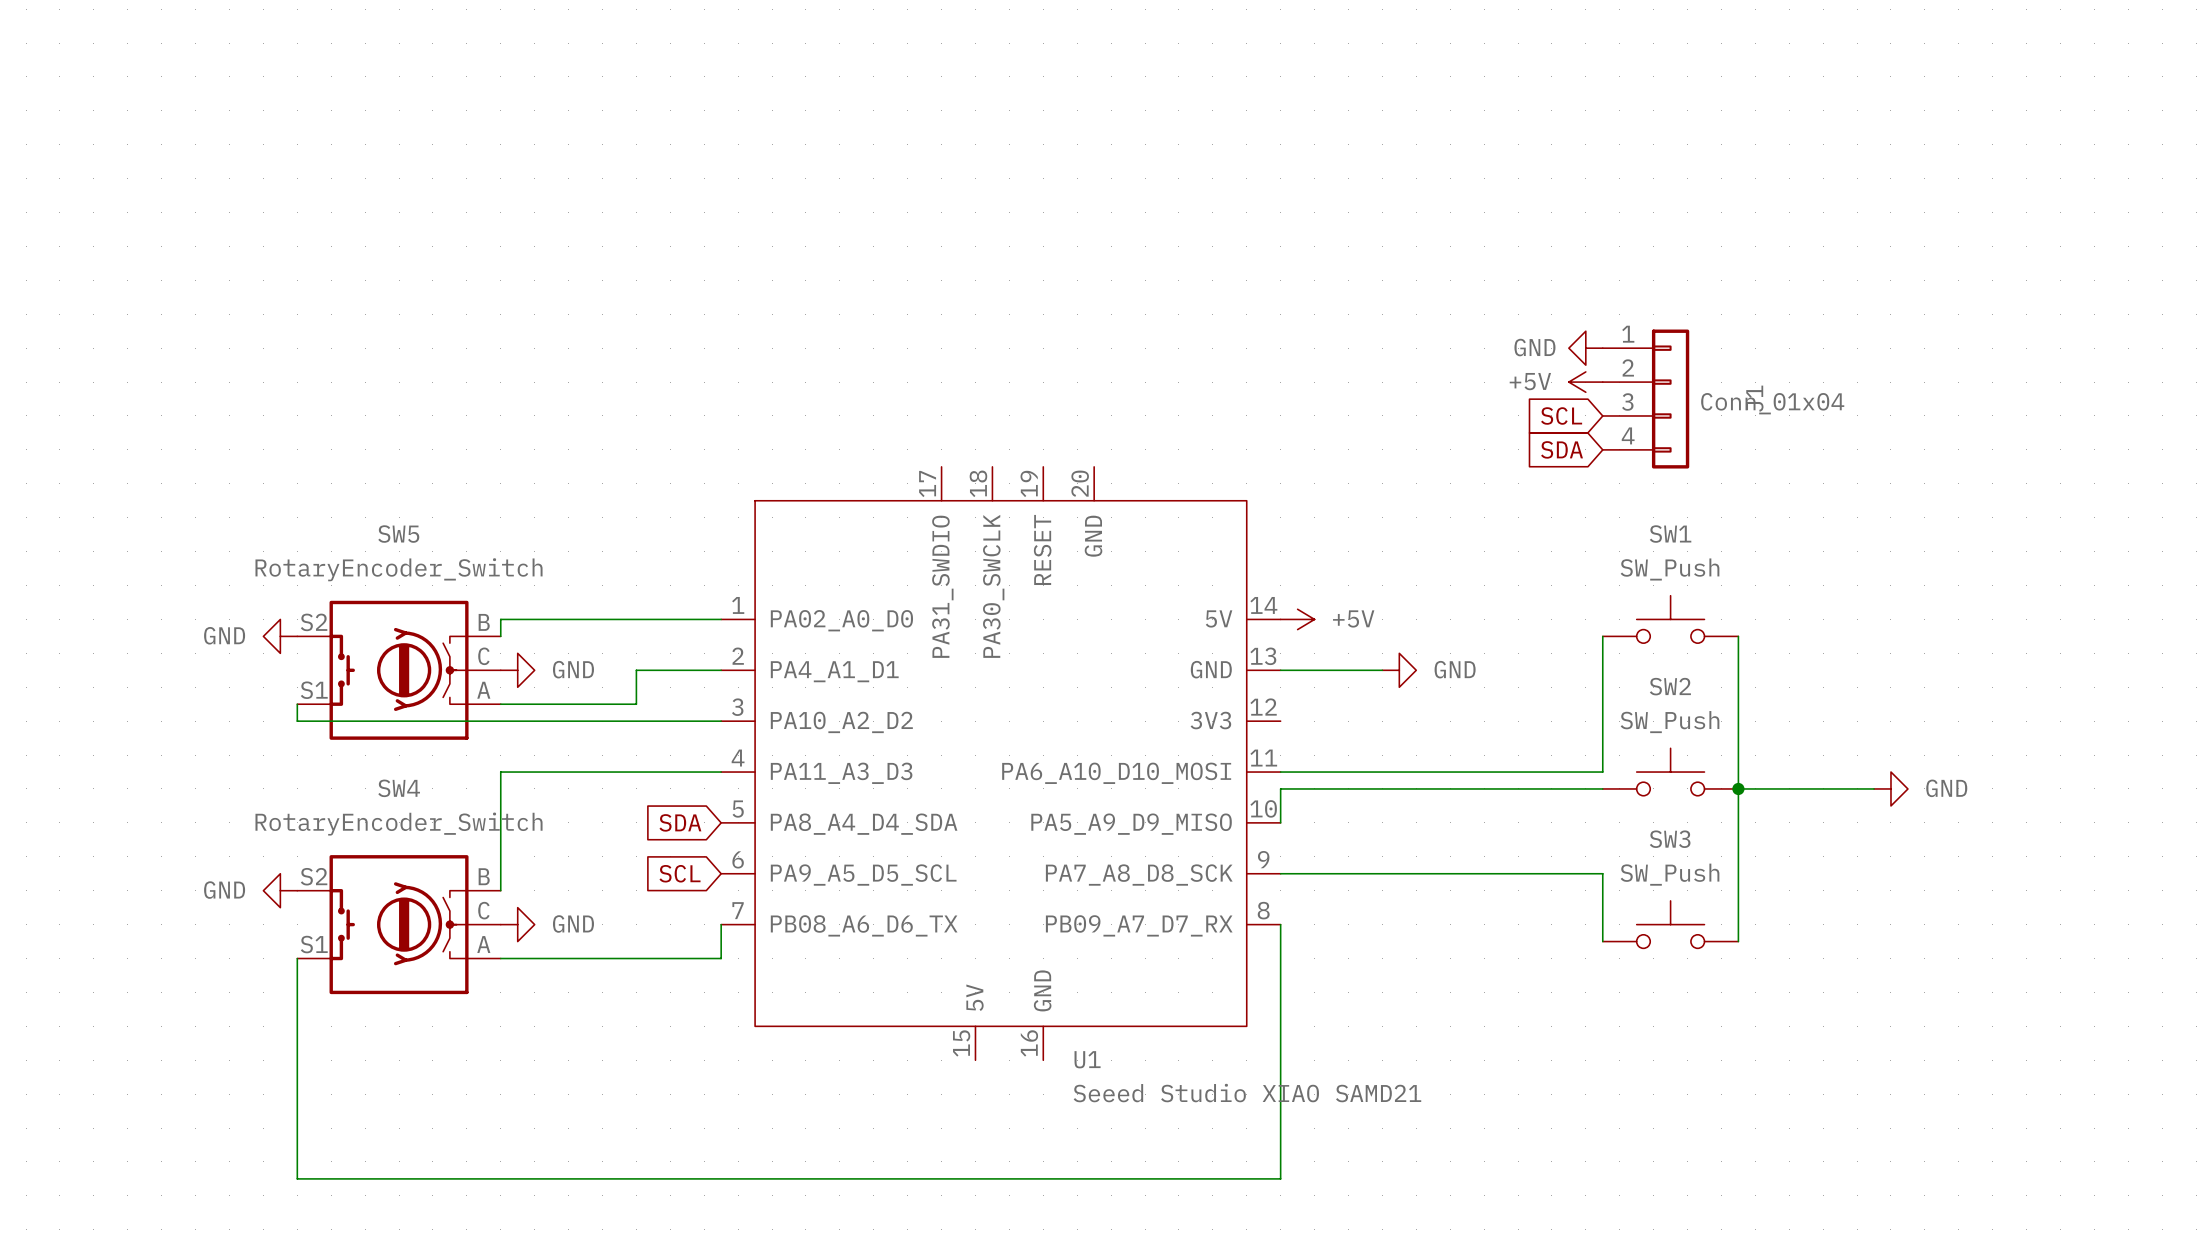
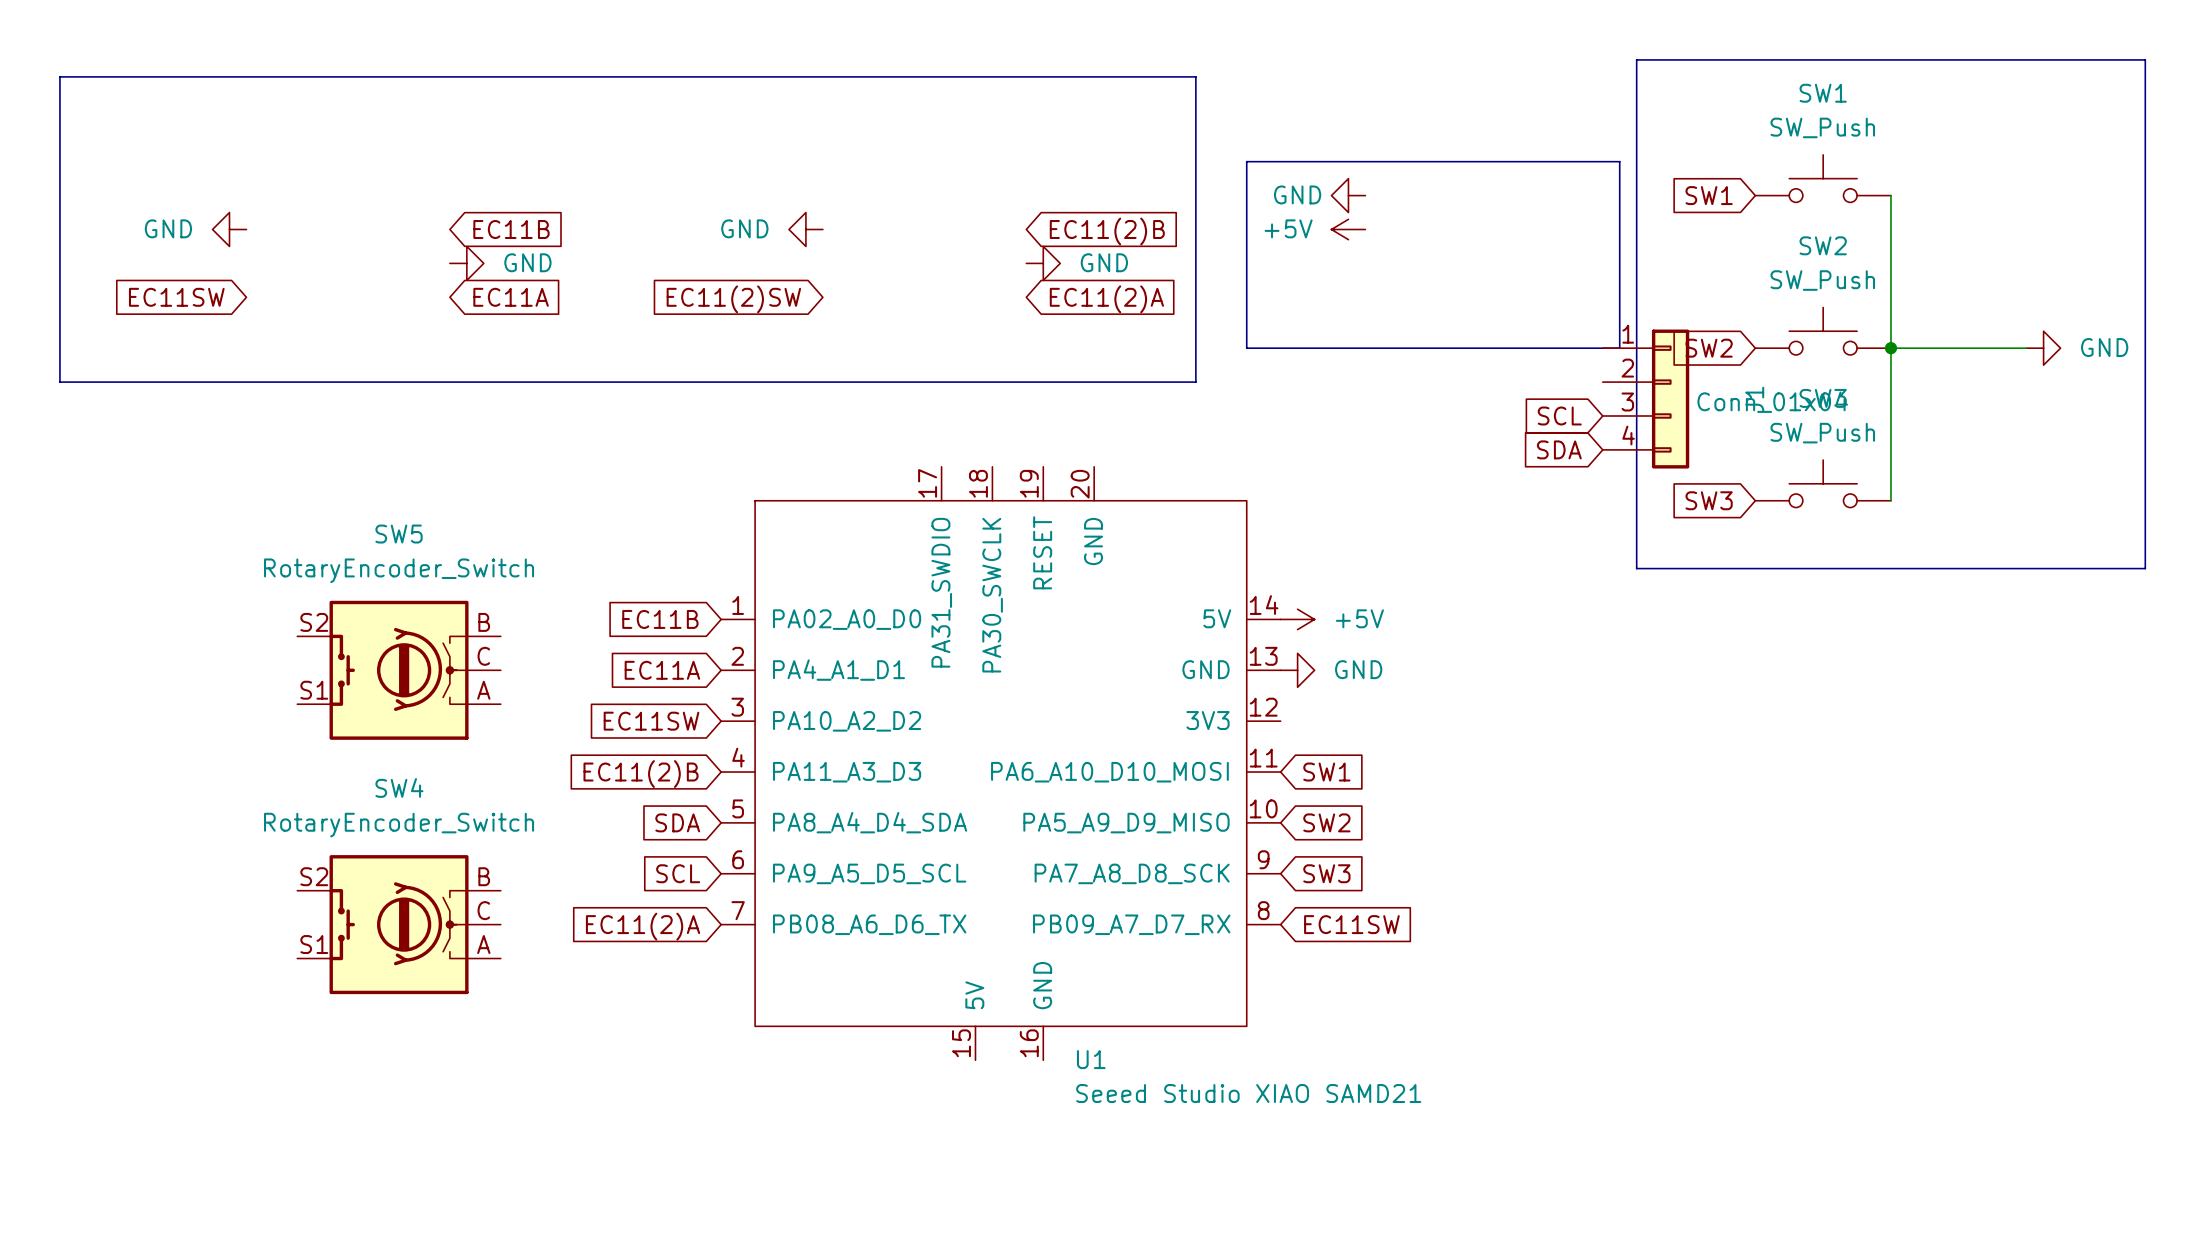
line: none -> (1636, 59) (2145, 59) (2145, 568) (1636, 568) (1636, 59)
line: none -> (59, 76) (1195, 76) (1195, 382) (59, 382) (59, 76)
line: none -> (1246, 161) (1619, 161) (1619, 348) (1246, 348) (1246, 161)
power symbol: none -> GND (1348, 195)
global label: none -> SW1 (1709, 195)
wire: none -> (1890, 195) (1890, 500)
power symbol: none -> GND (229, 229)
global label: none -> EC11B (511, 229)
power symbol: none -> GND (805, 229)
global label: none -> EC11(2)B (1107, 231)
power symbol: none -> GND (466, 263)
power symbol: none -> GND (1043, 263)
global label: none -> EC11SW (176, 297)
global label: none -> EC11A (511, 297)
global label: none -> EC11(2)SW (733, 299)
global label: none -> EC11(2)A (1106, 299)
power symbol: GND (1585, 348) -> none
global label: none -> SW2 (1709, 348)
wire: none -> (1890, 348) (2026, 348)
junction: none -> (1890, 348)
power symbol: none -> GND (2043, 348)
power symbol position: +5V (1585, 382) -> +5V (1348, 229)
global label: none -> SW3 (1709, 500)
global label: none -> EC11B (660, 619)
wire: (721, 619) (500, 619) (500, 636) -> none
SW1 position: (1670, 619) -> (1823, 178)
power symbol: GND (280, 636) -> none
wire: (1602, 636) (1602, 772) (1280, 772) -> none
wire: (1738, 636) (1738, 941) -> none
power symbol: GND (517, 670) -> none
global label: none -> EC11A (662, 670)
wire: (721, 670) (636, 670) (636, 704) (500, 704) -> none
wire: (1280, 670) (1382, 670) -> none
power symbol position: GND (1399, 670) -> GND (1297, 670)
wire: (297, 704) (297, 721) (721, 721) -> none
global label: none -> EC11SW (651, 721)
global label: none -> EC11(2)B (641, 774)
wire: (721, 772) (500, 772) (500, 890) -> none
global label: none -> SW1 (1326, 772)
SW2 position: (1670, 772) -> (1823, 331)
wire: (1602, 788) (1280, 788) (1280, 822) -> none
wire: (1738, 788) (1874, 788) -> none
junction: (1738, 788) -> none
power symbol: GND (1890, 788) -> none
global label: none -> SW2 (1326, 822)
wire: (1280, 873) (1602, 873) (1602, 941) -> none
global label: none -> SW3 (1326, 873)
power symbol: GND (280, 890) -> none
power symbol: GND (517, 924) -> none
wire: (721, 924) (721, 958) (500, 958) -> none
wire: (1280, 924) (1280, 1178) (297, 1178) (297, 958) -> none
global label: none -> EC11SW (1351, 924)
SW3 position: (1670, 924) -> (1823, 483)
global label: none -> EC11(2)A (643, 926)

